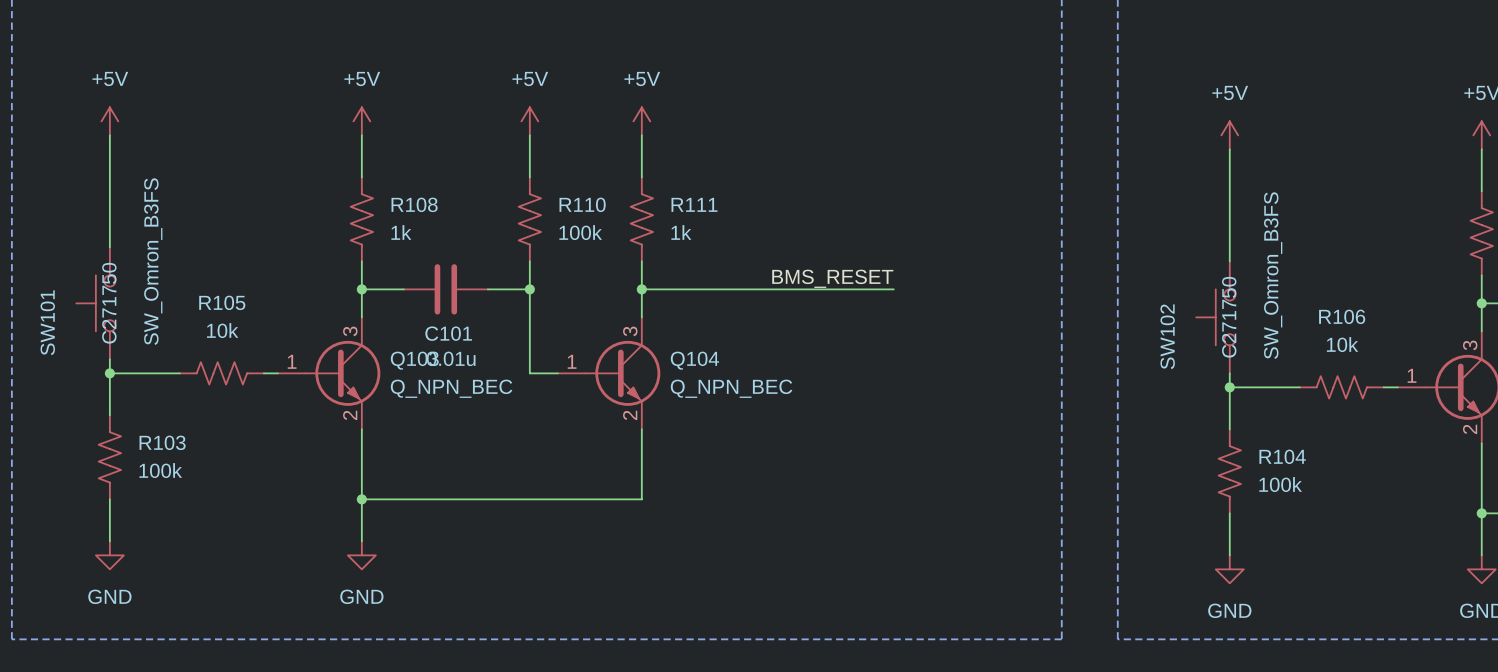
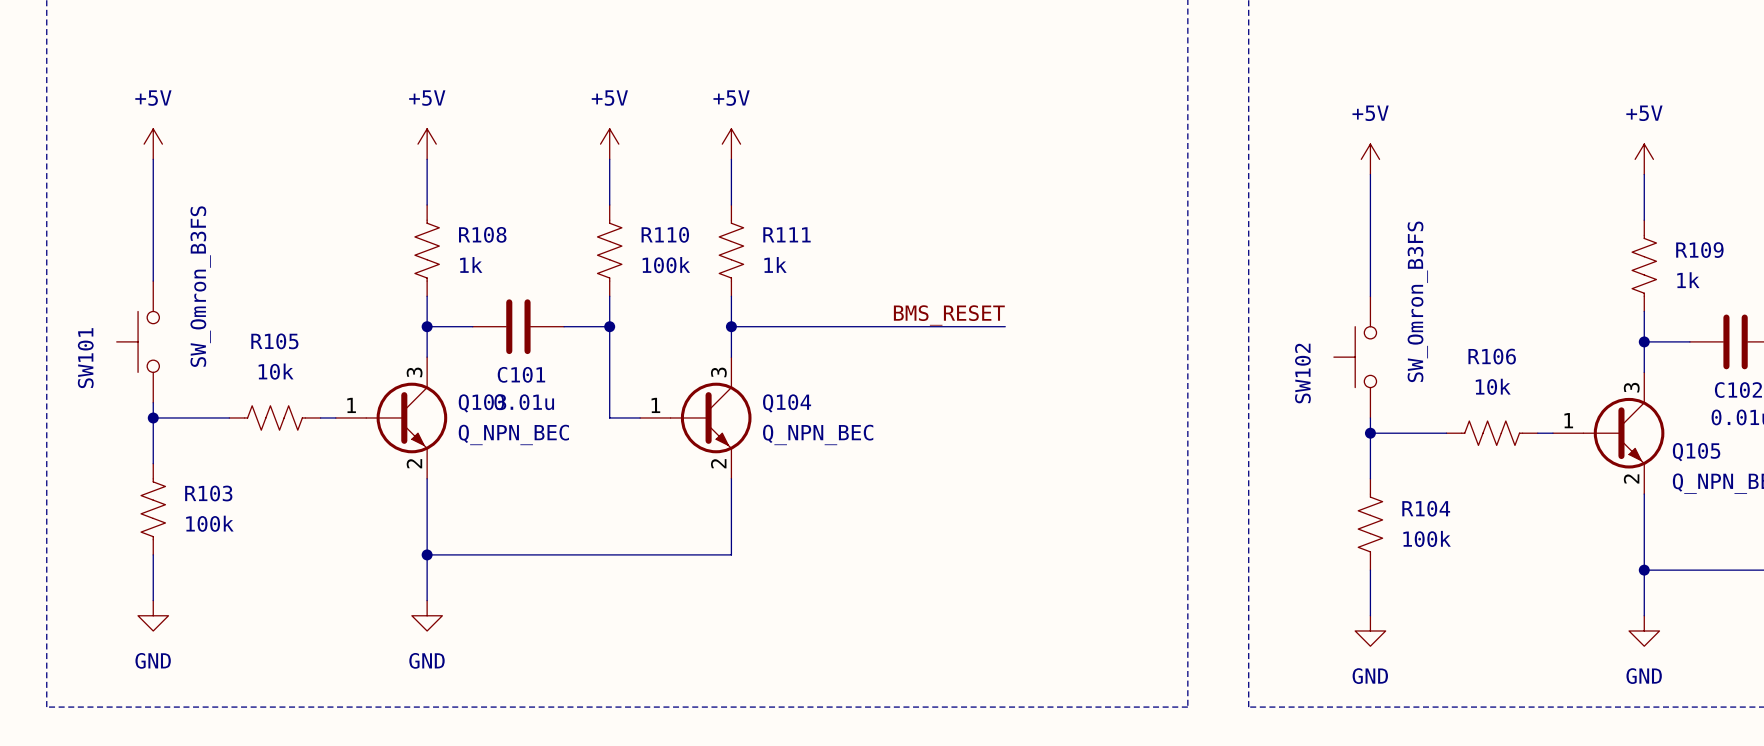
SW101 text: C271750 (109, 303) -> none
SW102 text: C271750 (1229, 317) -> none

